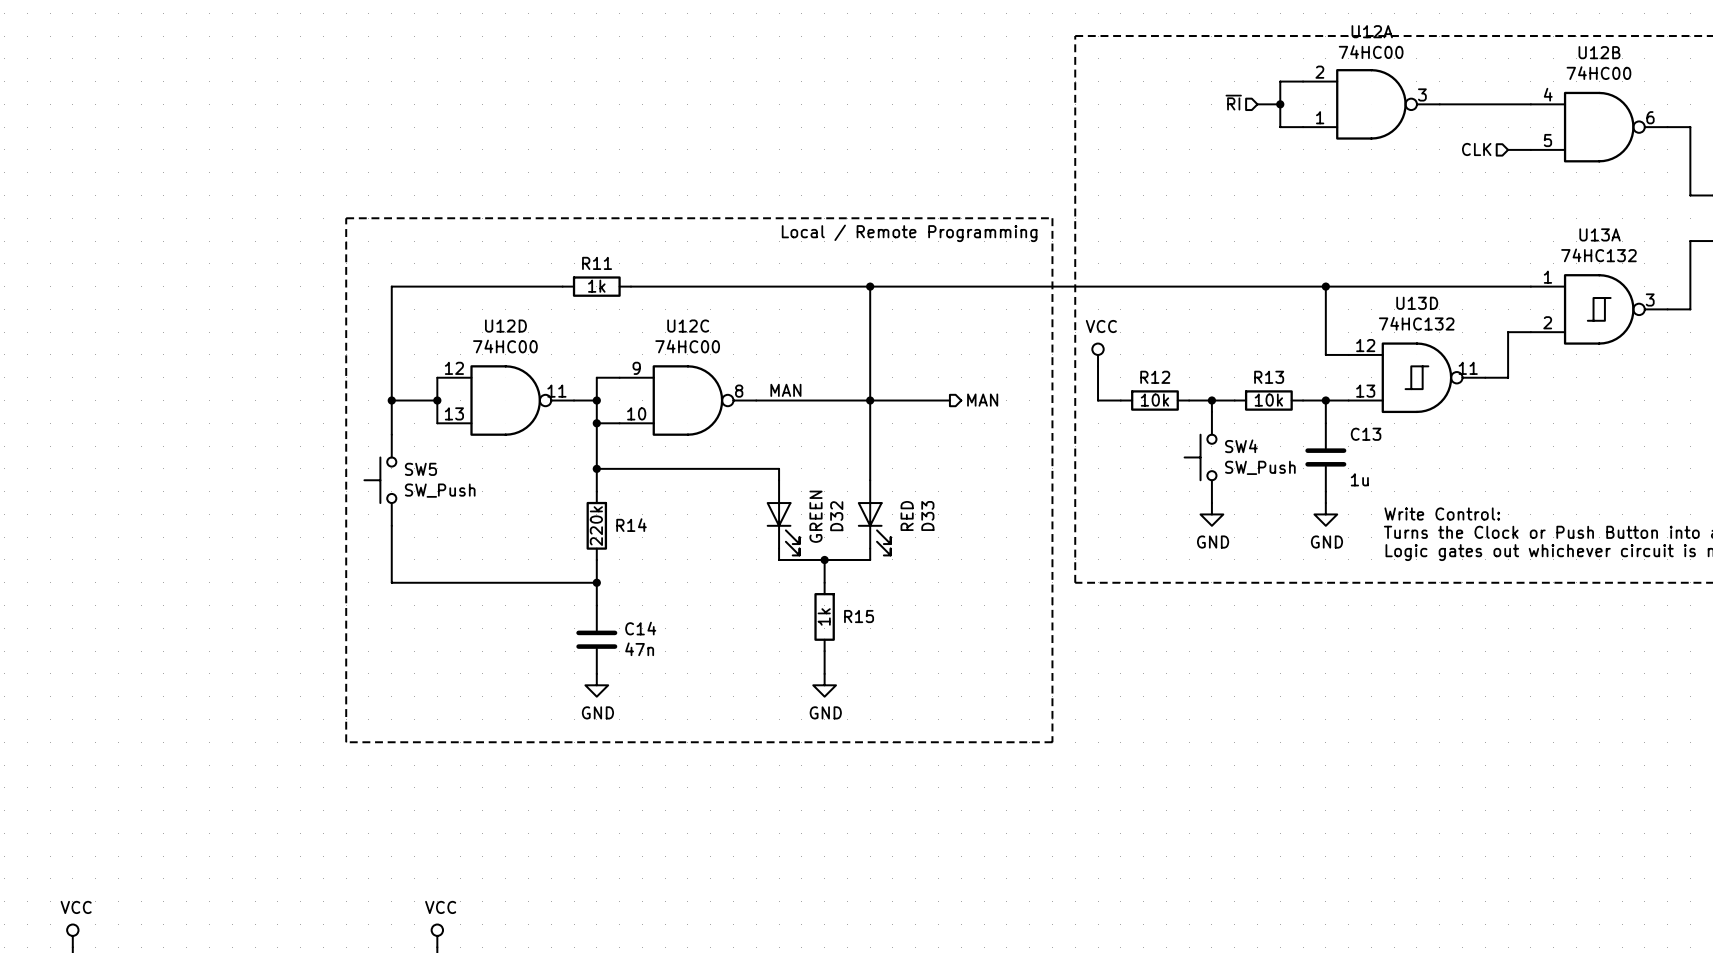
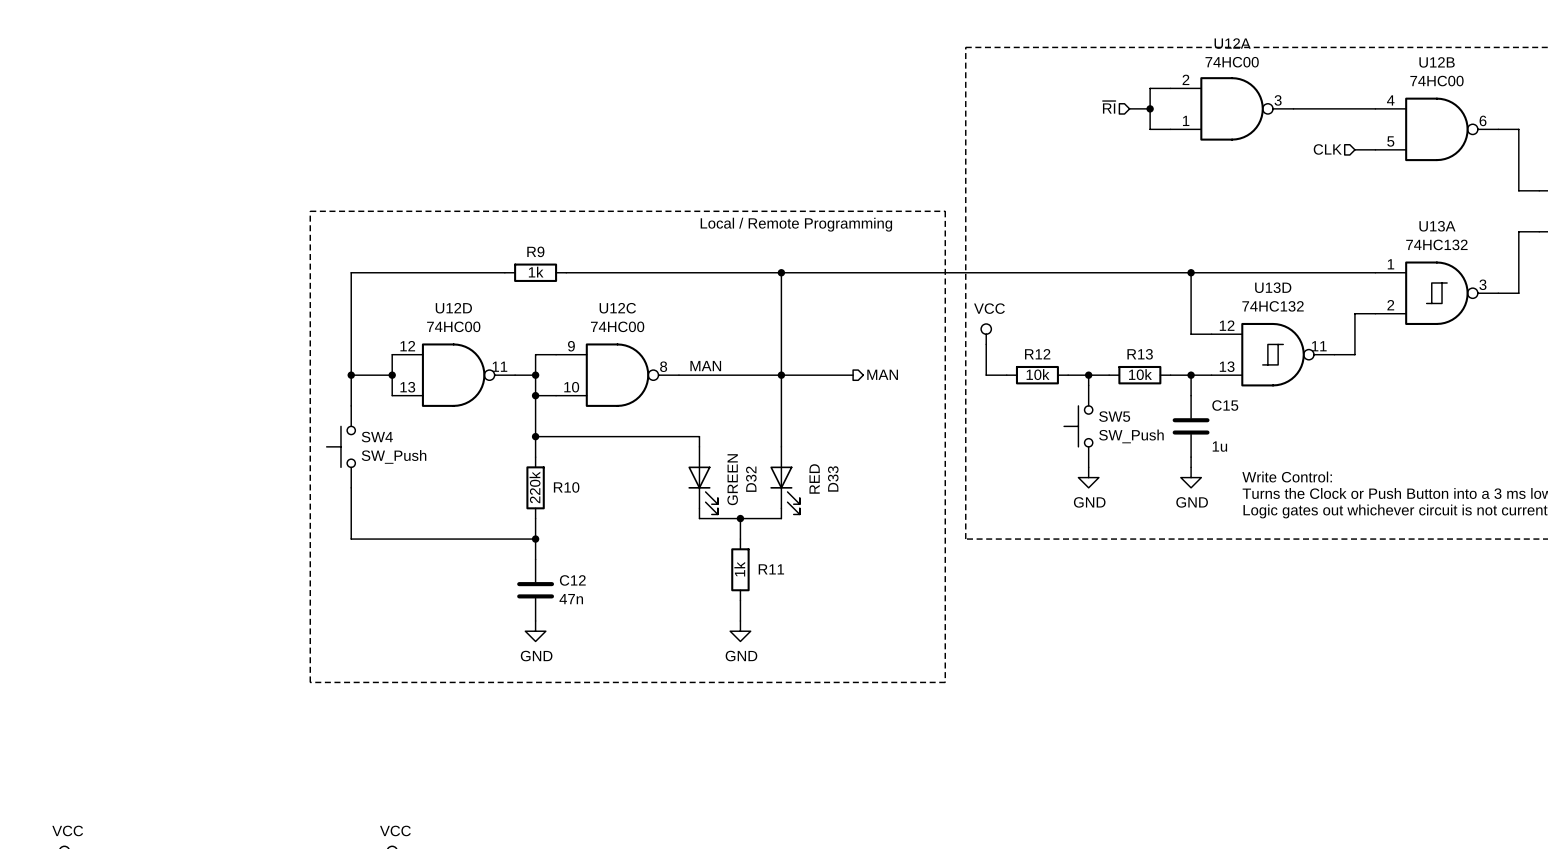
R11 name: R11 (597, 263) -> R9 (535, 251)
C13 name: C13 (1366, 434) -> C15 (1225, 405)
SW4 name: SW4 (1241, 446) -> SW5 (1114, 416)
SW5 name: SW5 (420, 469) -> SW4 (377, 437)
R14 name: R14 (631, 525) -> R10 (566, 487)
R15 name: R15 (859, 616) -> R11 (771, 569)
C14 name: C14 (640, 628) -> C12 (572, 580)

